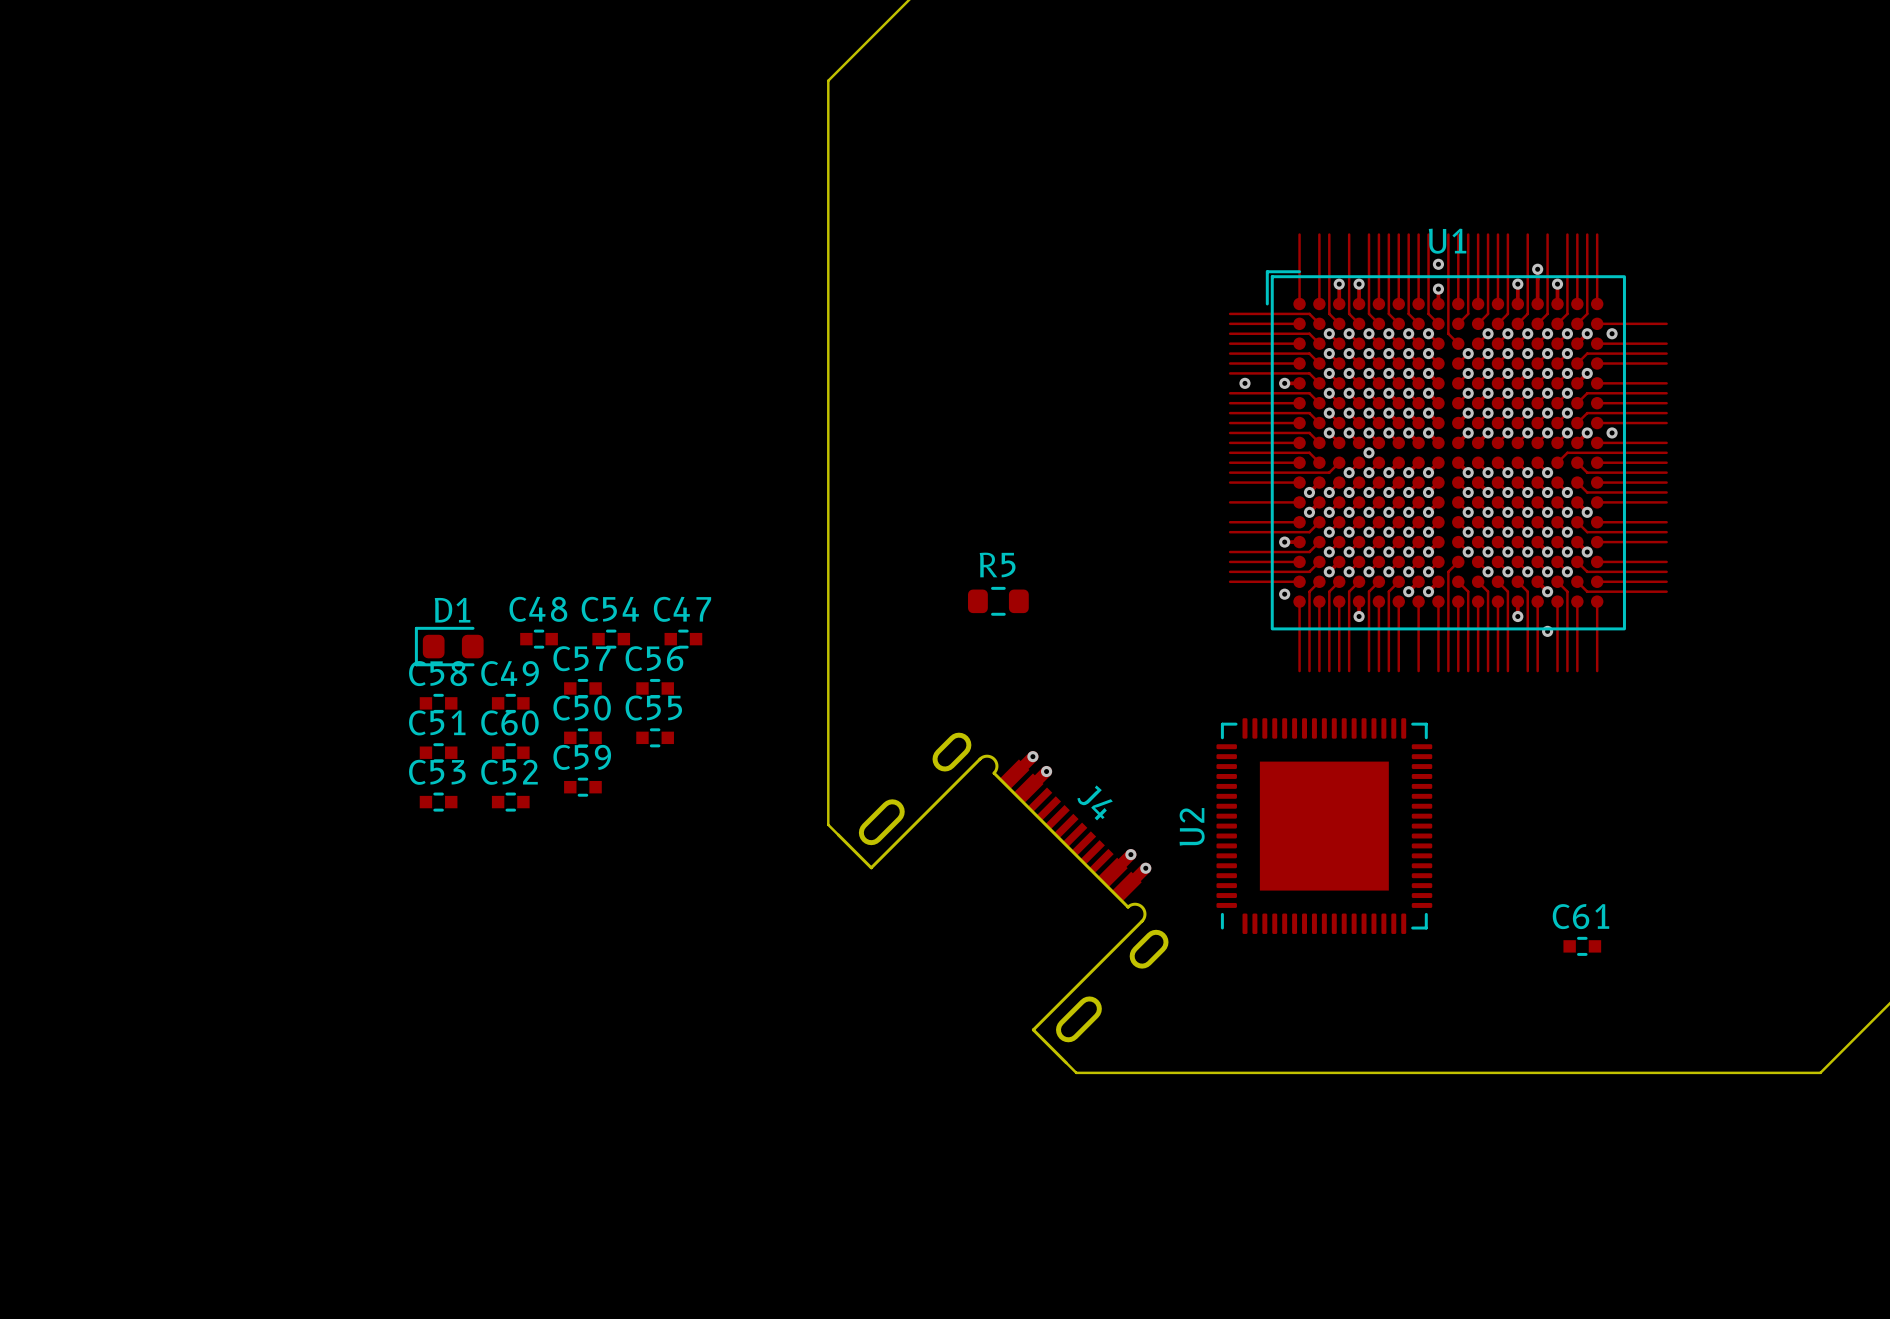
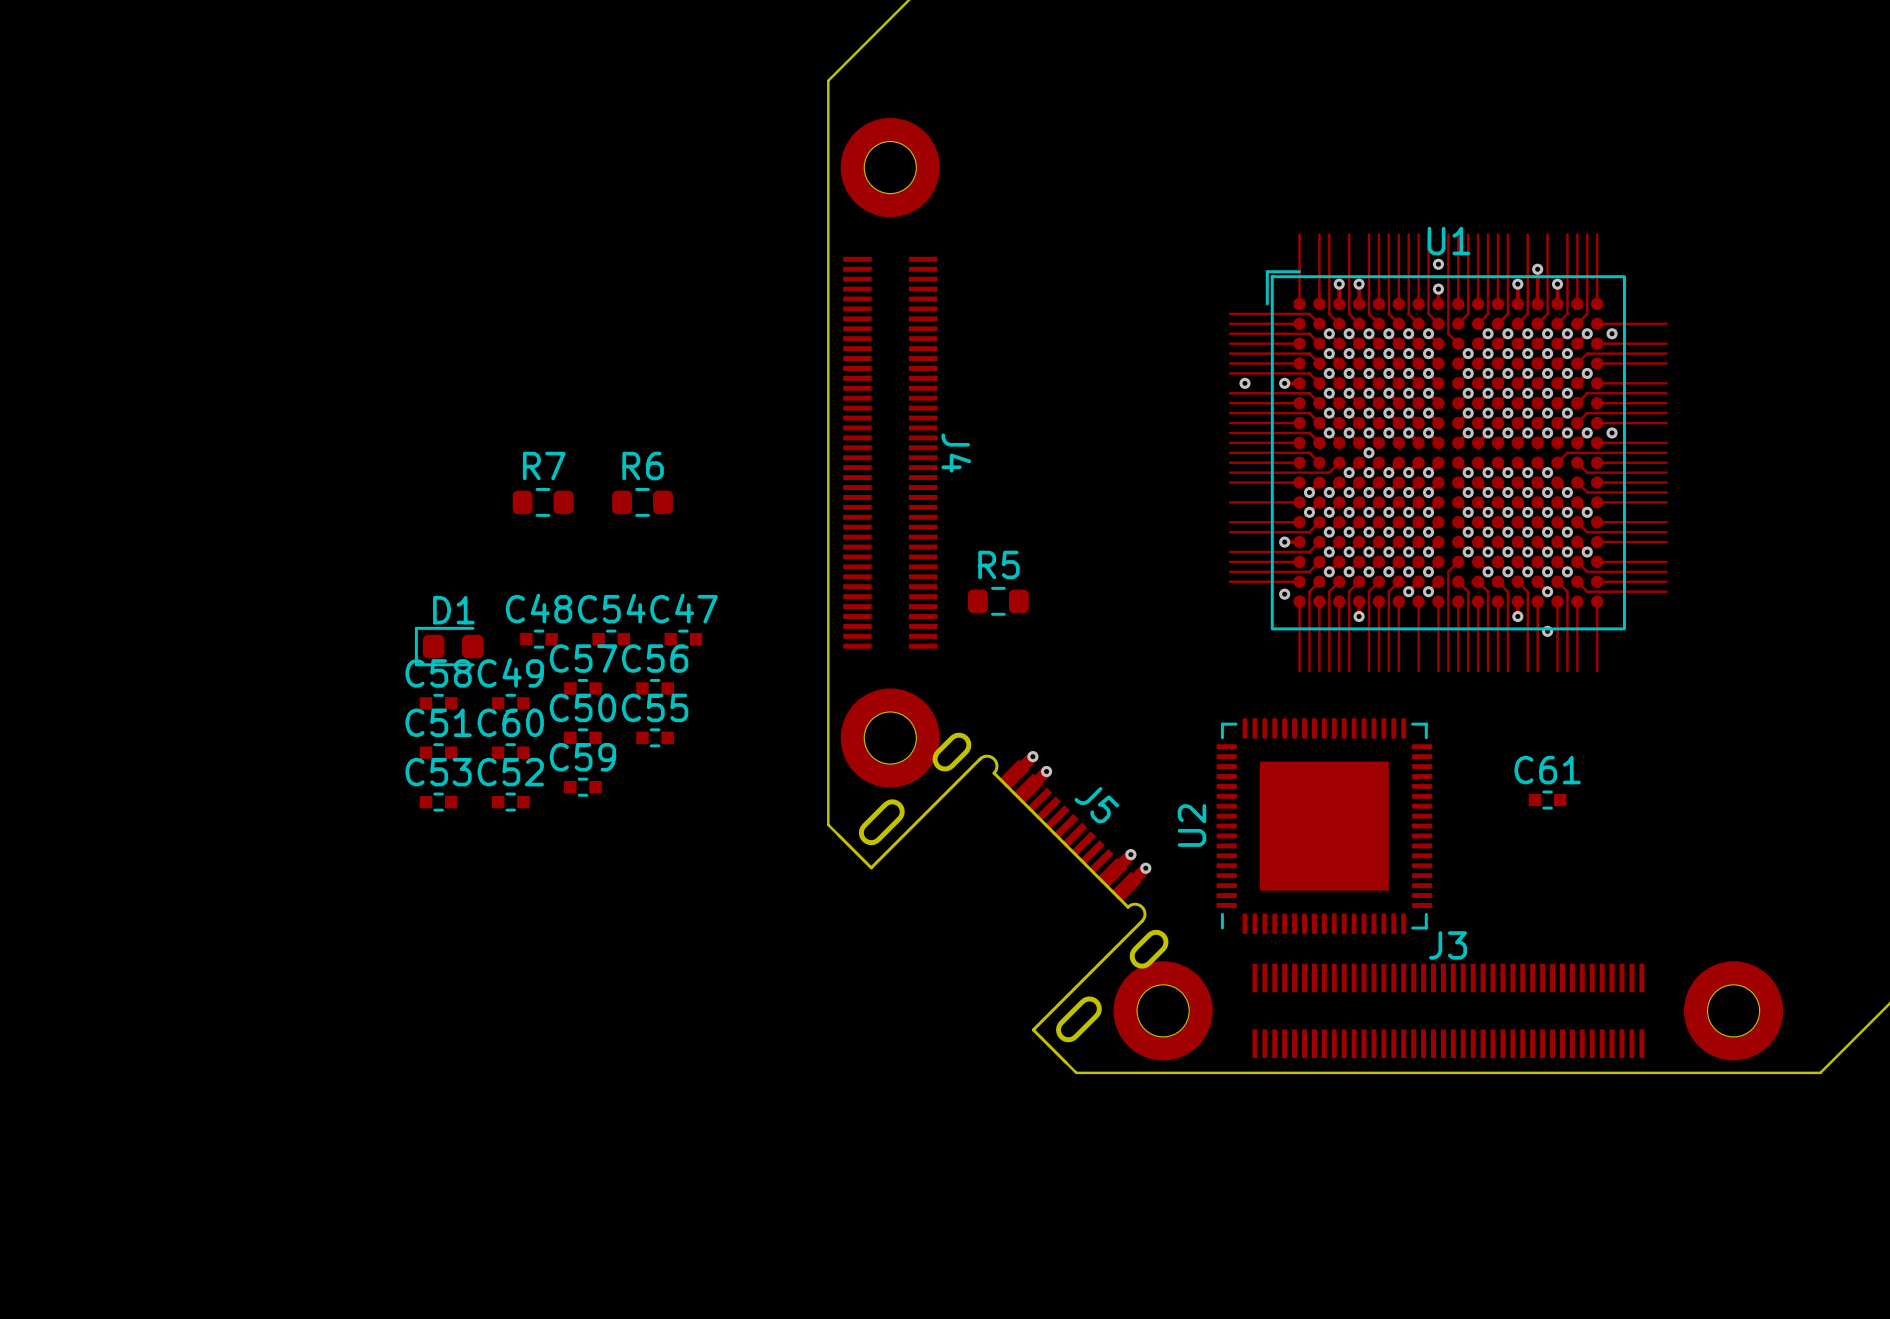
part: none -> (890, 167)
J4: none -> (890, 452)
R7: none -> (543, 502)
R6: none -> (642, 502)
part: none -> (890, 738)
J4 name: J4 (1095, 802) -> J5 (1096, 805)
C61 position: (1582, 946) -> (1547, 800)
part: none -> (1163, 1010)
J3: none -> (1448, 1010)
part: none -> (1733, 1010)

